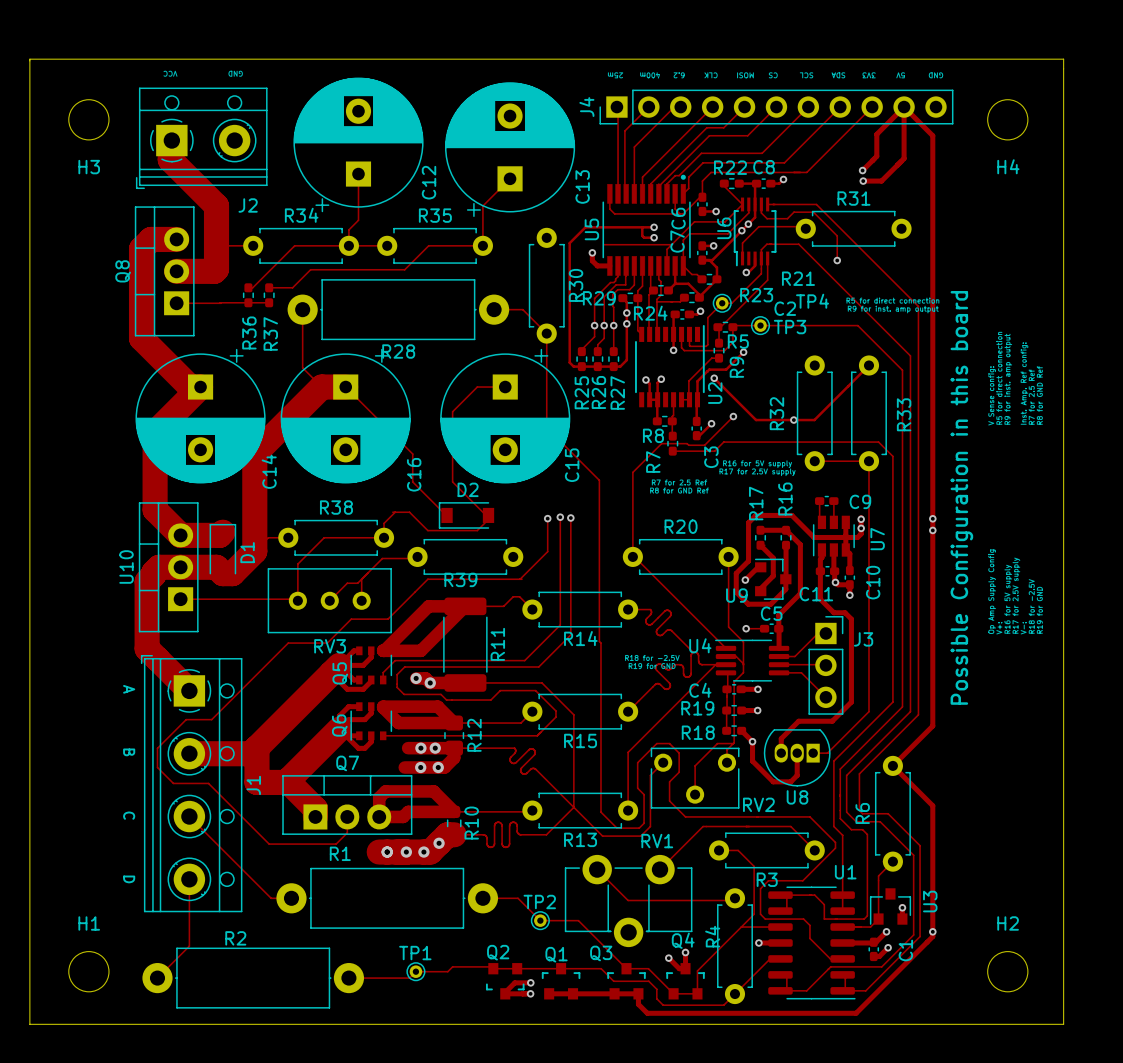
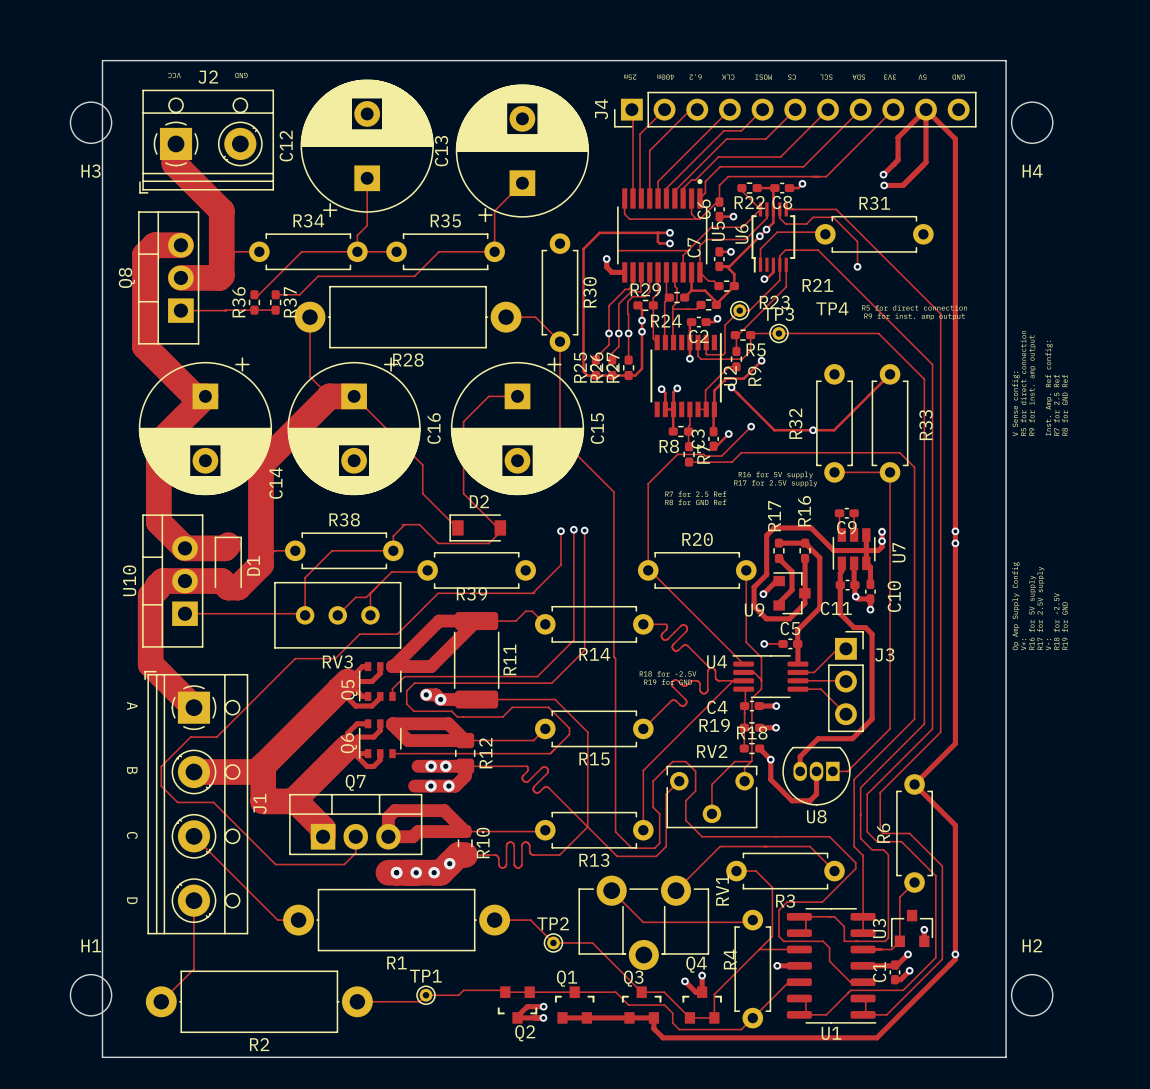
board edge: (100, 59) (29, 59) (29, 1024) (1063, 1024) (1063, 59) (982, 59) -> (102, 60) (102, 1057) (1006, 1057) (1006, 60)
R22 name position: R22 (730, 167) -> R22 (749, 202)
C8 name position: C8 (764, 167) -> C8 (782, 202)
C12 name position: C12 (429, 182) -> C12 (286, 146)
C13 name position: C13 (582, 186) -> C13 (441, 151)
J2 name position: J2 (248, 205) -> J2 (208, 77)
C6 name position: C6 (678, 218) -> C6 (704, 209)
U5 name position: U5 (591, 229) -> U5 (718, 231)
R29 name position: R29 (599, 298) -> R29 (645, 289)
C2 name position: C2 (785, 308) -> C2 (698, 336)
TP3 name position: TP3 (790, 327) -> TP3 (778, 314)
R36 name position: R36 (249, 332) -> R36 (238, 302)
R37 name position: R37 (270, 333) -> R37 (290, 302)
R25 name position: R25 (581, 392) -> R25 (580, 367)
R26 name position: R26 (598, 392) -> R26 (596, 367)
R27 name position: R27 (617, 392) -> R27 (612, 367)
U2 name position: U2 (715, 393) -> U2 (730, 375)
C3 name position: C3 (711, 457) -> C3 (698, 439)
R7 name position: R7 (653, 462) -> R7 (703, 454)
C15 name position: C15 (572, 465) -> C15 (597, 428)
C16 name position: C16 (414, 474) -> C16 (434, 428)
text: Possible Configuration in this board (961, 497) -> none
C9 name position: C9 (860, 501) -> C9 (846, 527)
R18 name position: R18 (698, 732) -> R18 (752, 732)
RV2 name position: RV2 (758, 804) -> RV2 (712, 751)
RV1 name rotation: 0° (657, 841) -> 90° counterclockwise (722, 890)
RV1 name position: RV1 (657, 841) -> RV1 (722, 890)
R1 name position: R1 (340, 853) -> R1 (396, 962)
U1 name position: U1 (845, 872) -> U1 (831, 1033)
U3 name position: U3 (930, 901) -> U3 (879, 928)
R2 name position: R2 (235, 938) -> R2 (259, 1044)
C1 name position: C1 (905, 950) -> C1 (879, 972)
Q2 name position: Q2 (498, 952) -> Q2 (525, 1033)
Q3 name position: Q3 (601, 953) -> Q3 (633, 978)

